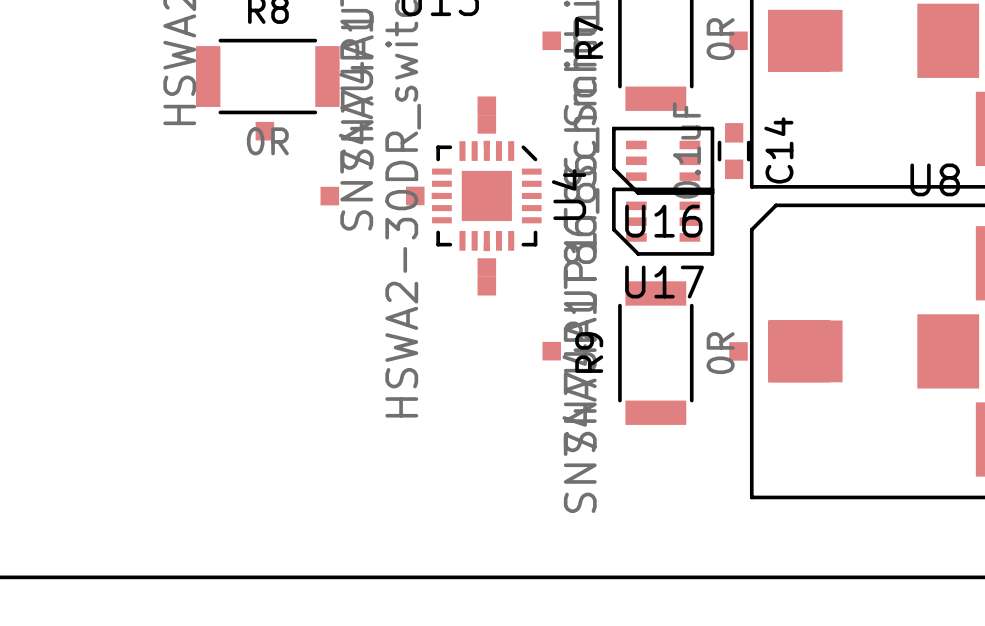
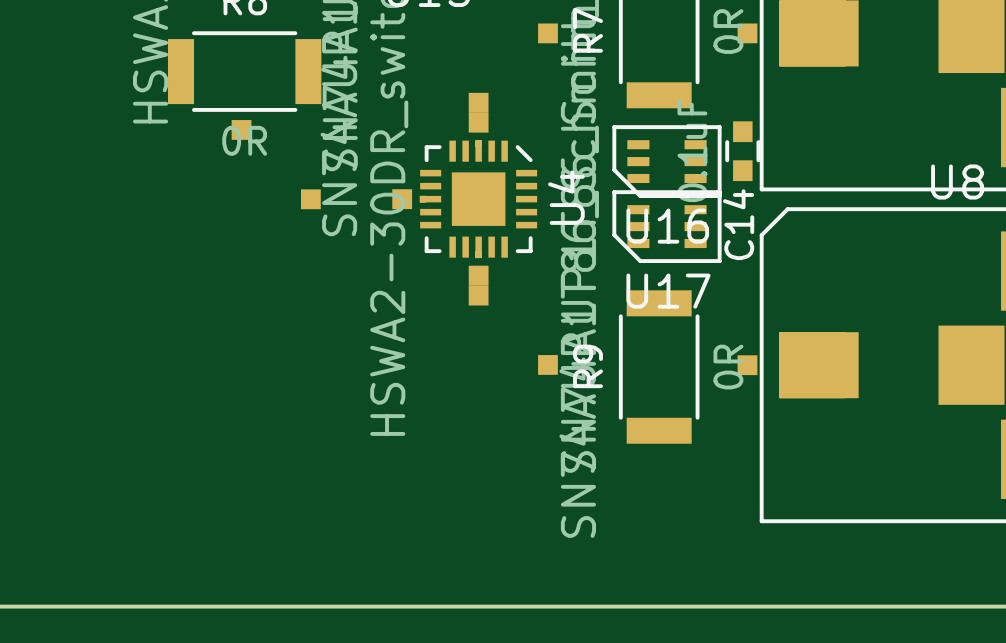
C14 name position: C14 (778, 150) -> C14 (738, 224)

